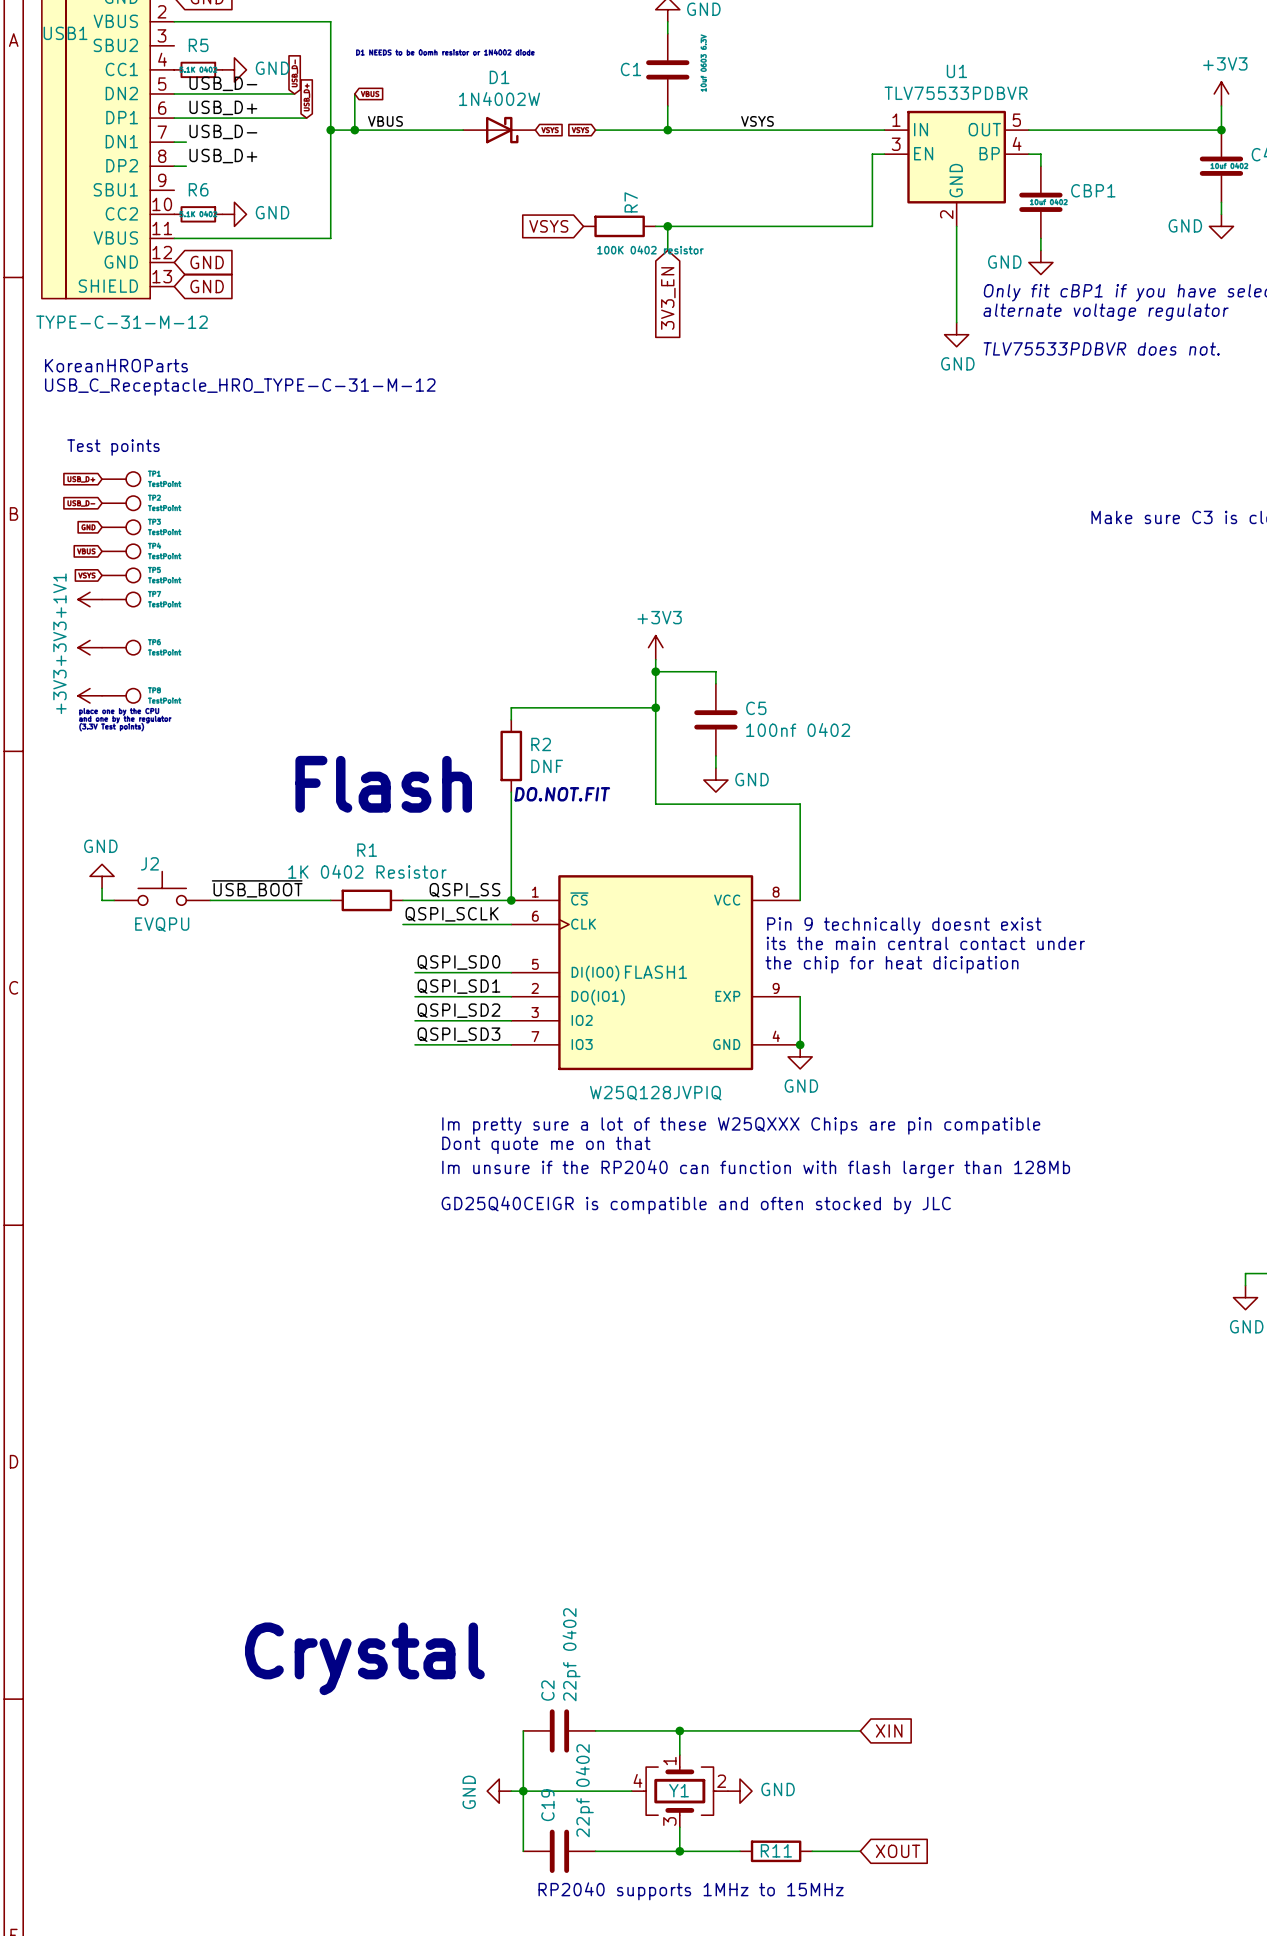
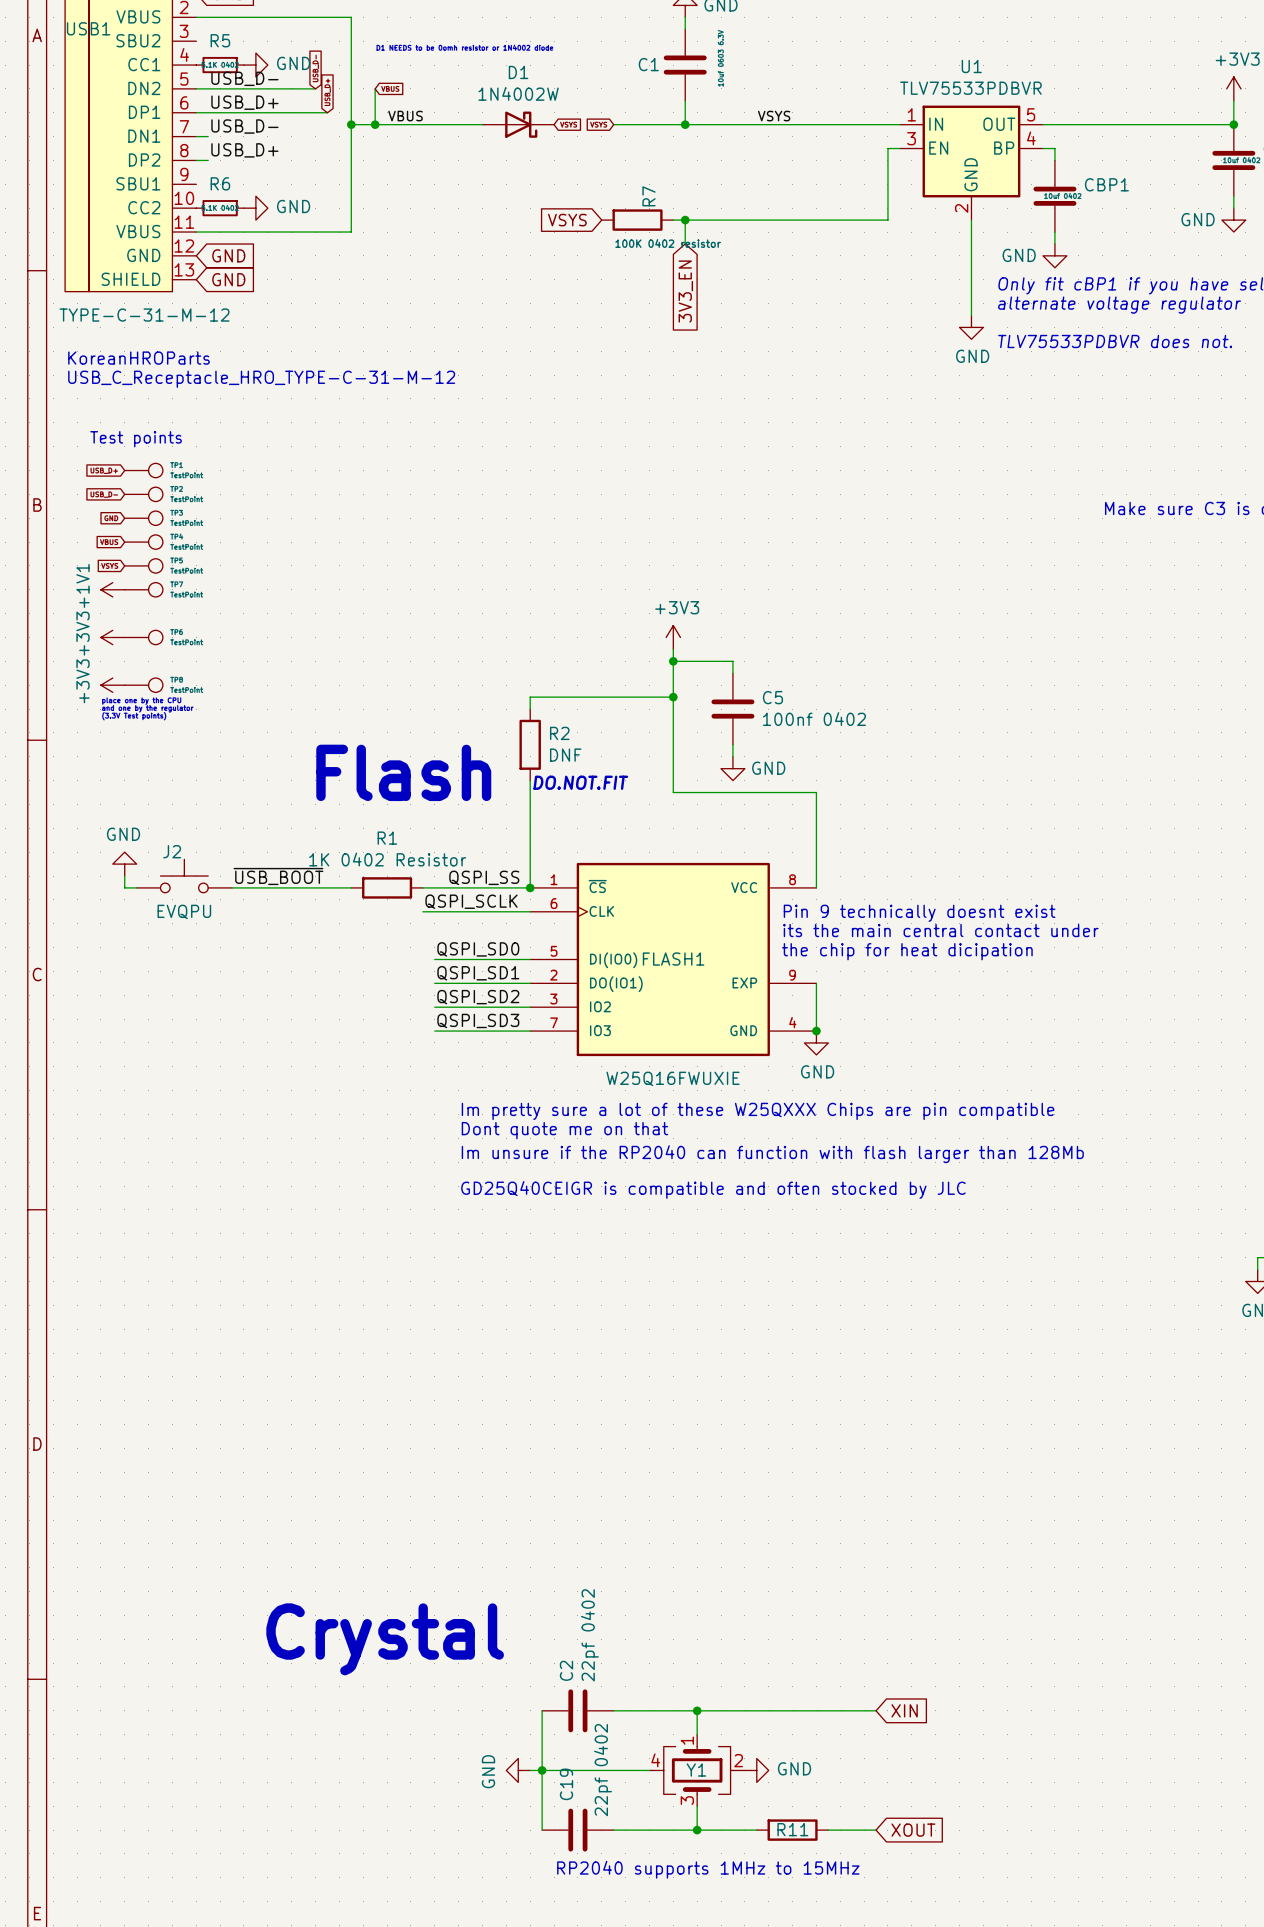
FLASH1 value: W25Q128JVPIQ (655, 1093) -> W25Q16FWUXIE (673, 1078)

